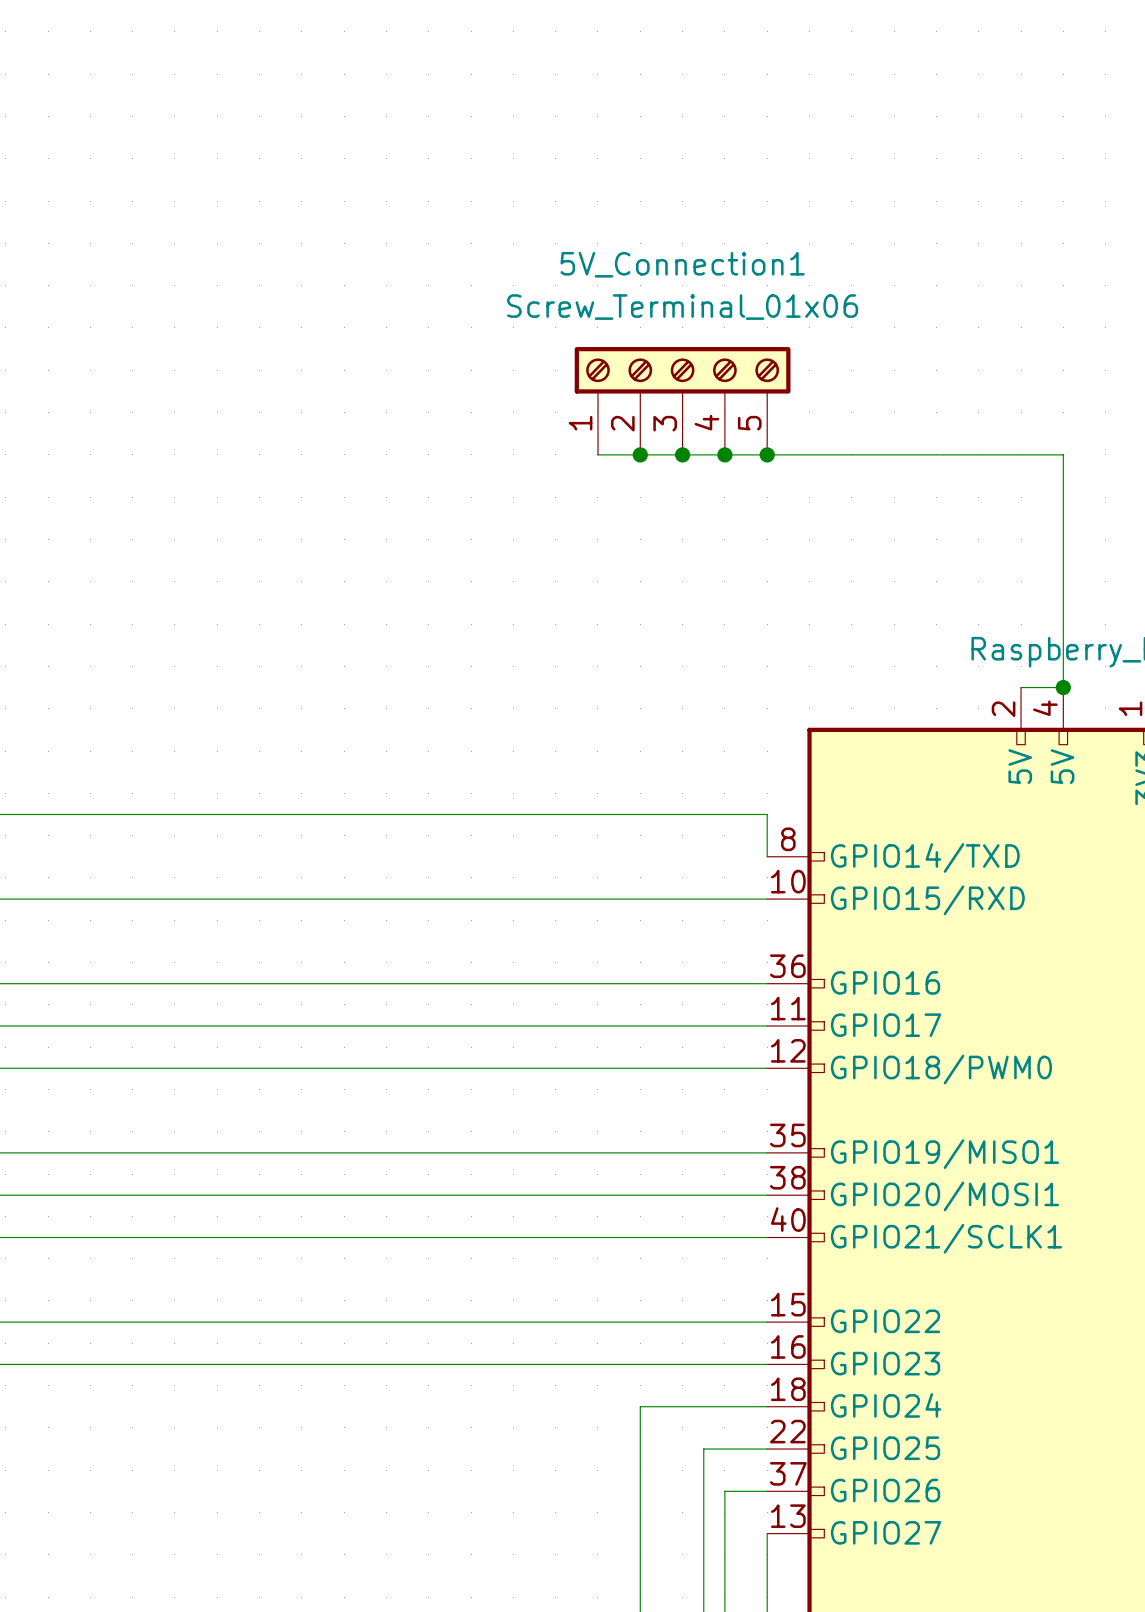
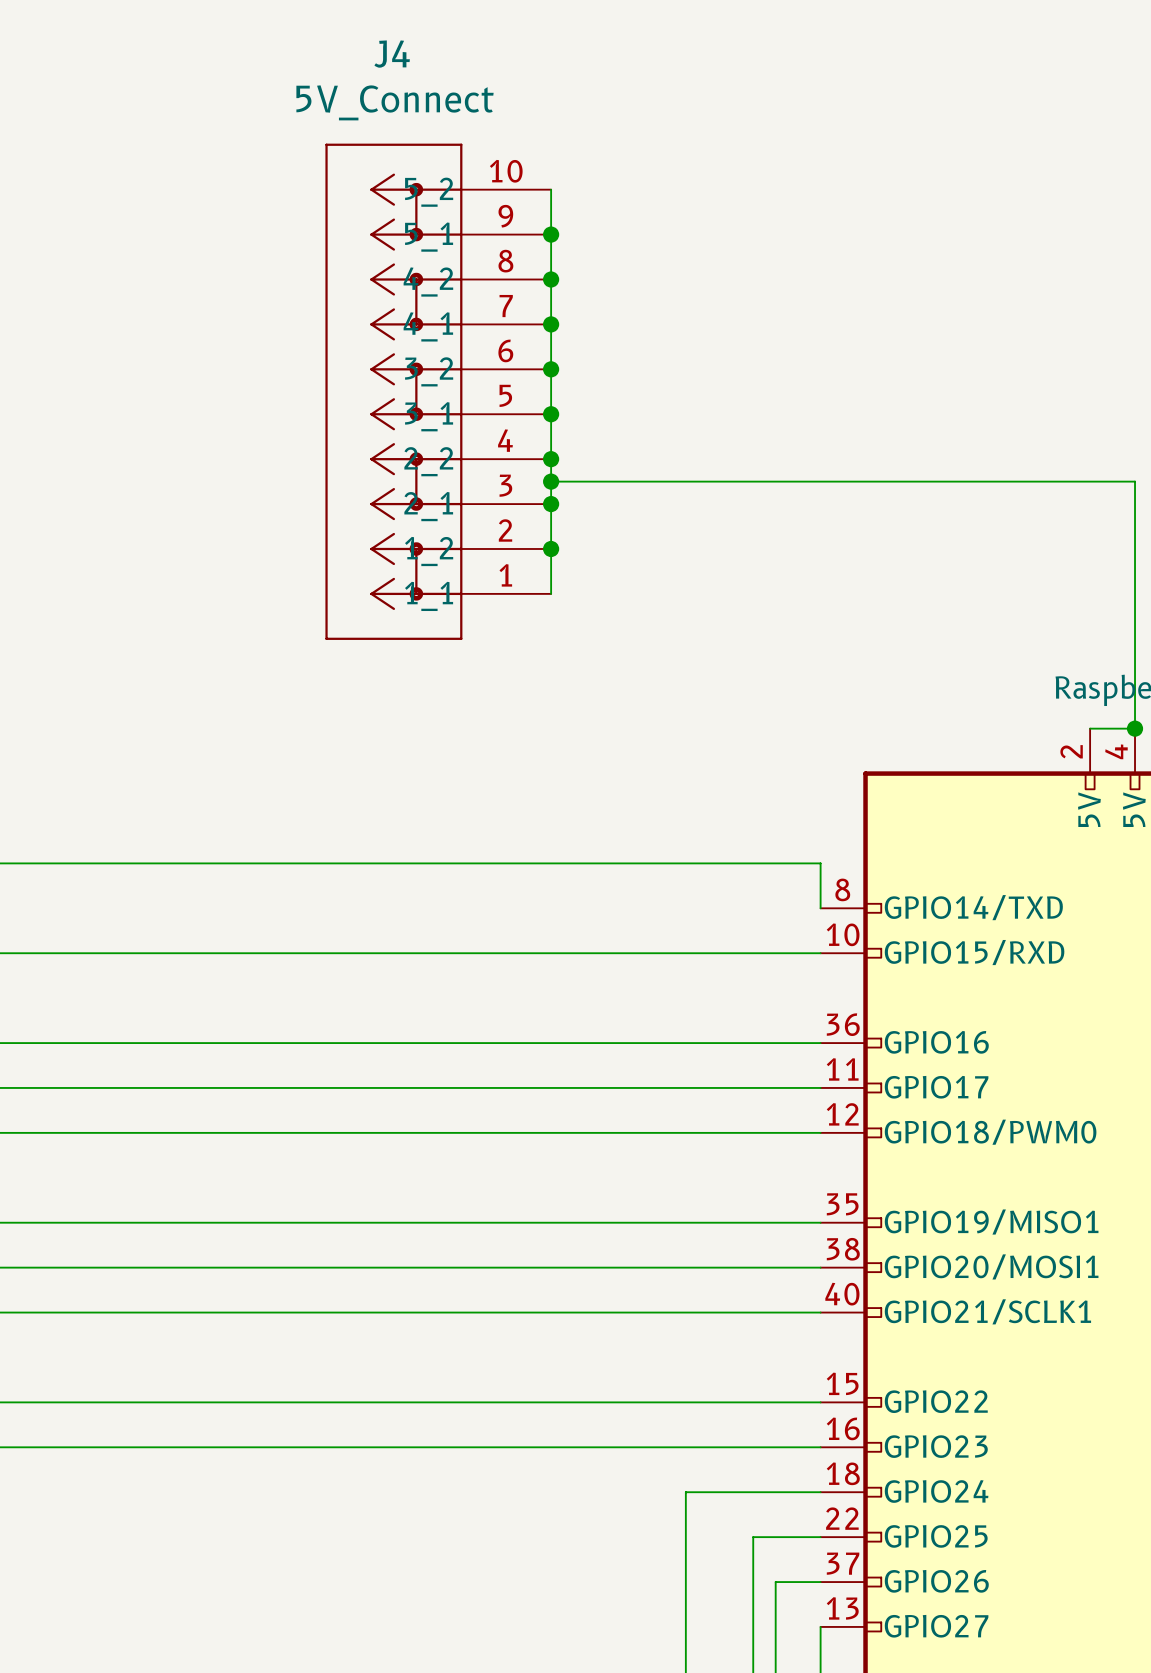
wire: none -> (551, 189) (551, 593)
junction: none -> (551, 234)
junction: none -> (551, 279)
junction: none -> (551, 324)
junction: none -> (551, 369)
J4: none -> 5V_Connect (438, 391)
junction: none -> (551, 414)
5V_Connection1: Screw_Terminal_01x06 (682, 400) -> none
junction: none -> (551, 459)
wire: none -> (551, 481) (640, 481)
junction: none -> (551, 481)
junction: (640, 454) -> none
junction: (682, 454) -> none
junction: (724, 454) -> none
junction: (767, 454) -> none
junction: none -> (551, 504)
junction: none -> (551, 548)

